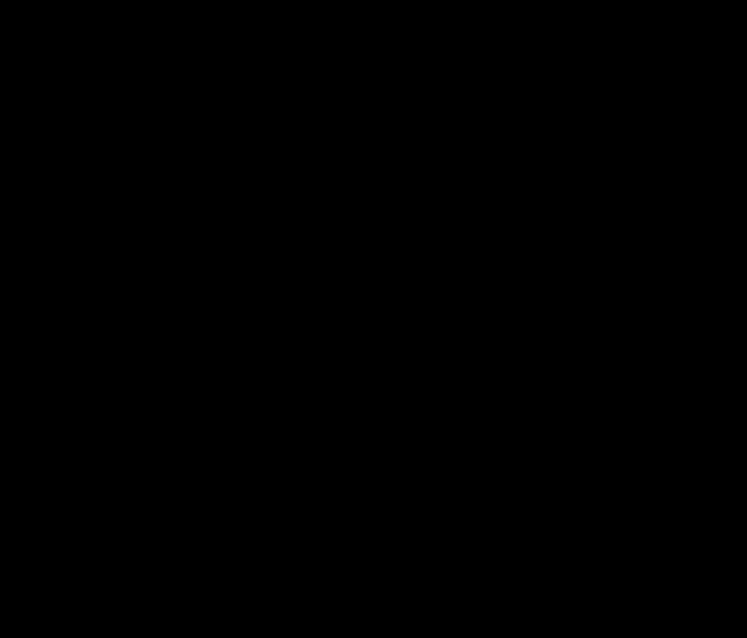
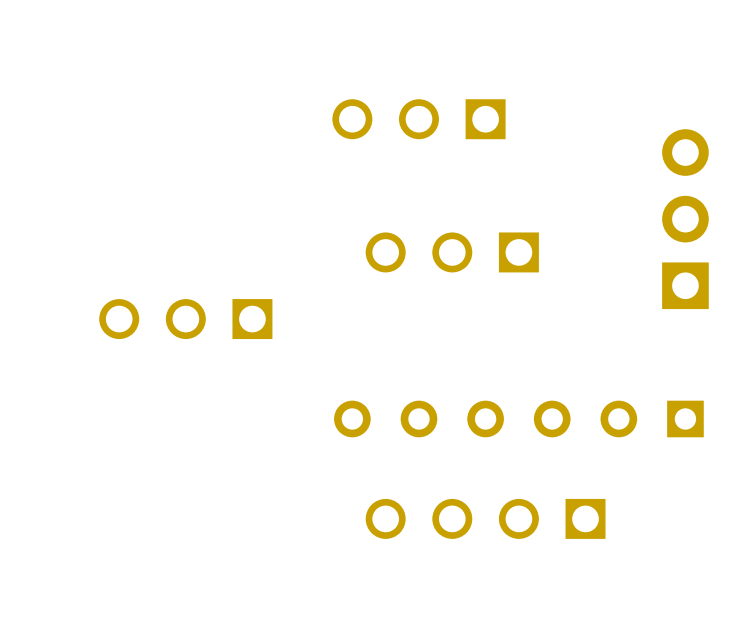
part: none -> (418, 119)
part: none -> (685, 219)
part: none -> (452, 252)
part: none -> (185, 319)
part: none -> (518, 418)
part: none -> (485, 518)

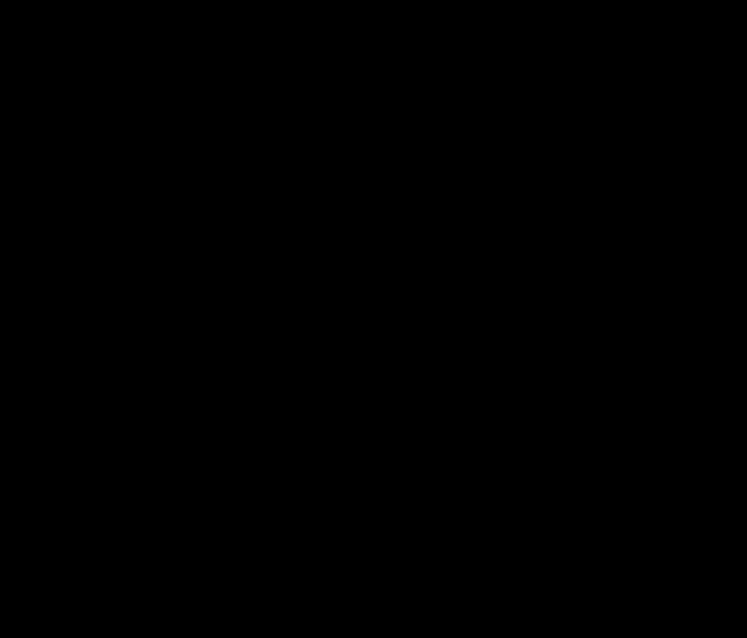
part: (418, 119) -> none
part: (685, 219) -> none
part: (452, 252) -> none
part: (185, 319) -> none
part: (518, 418) -> none
part: (485, 518) -> none

